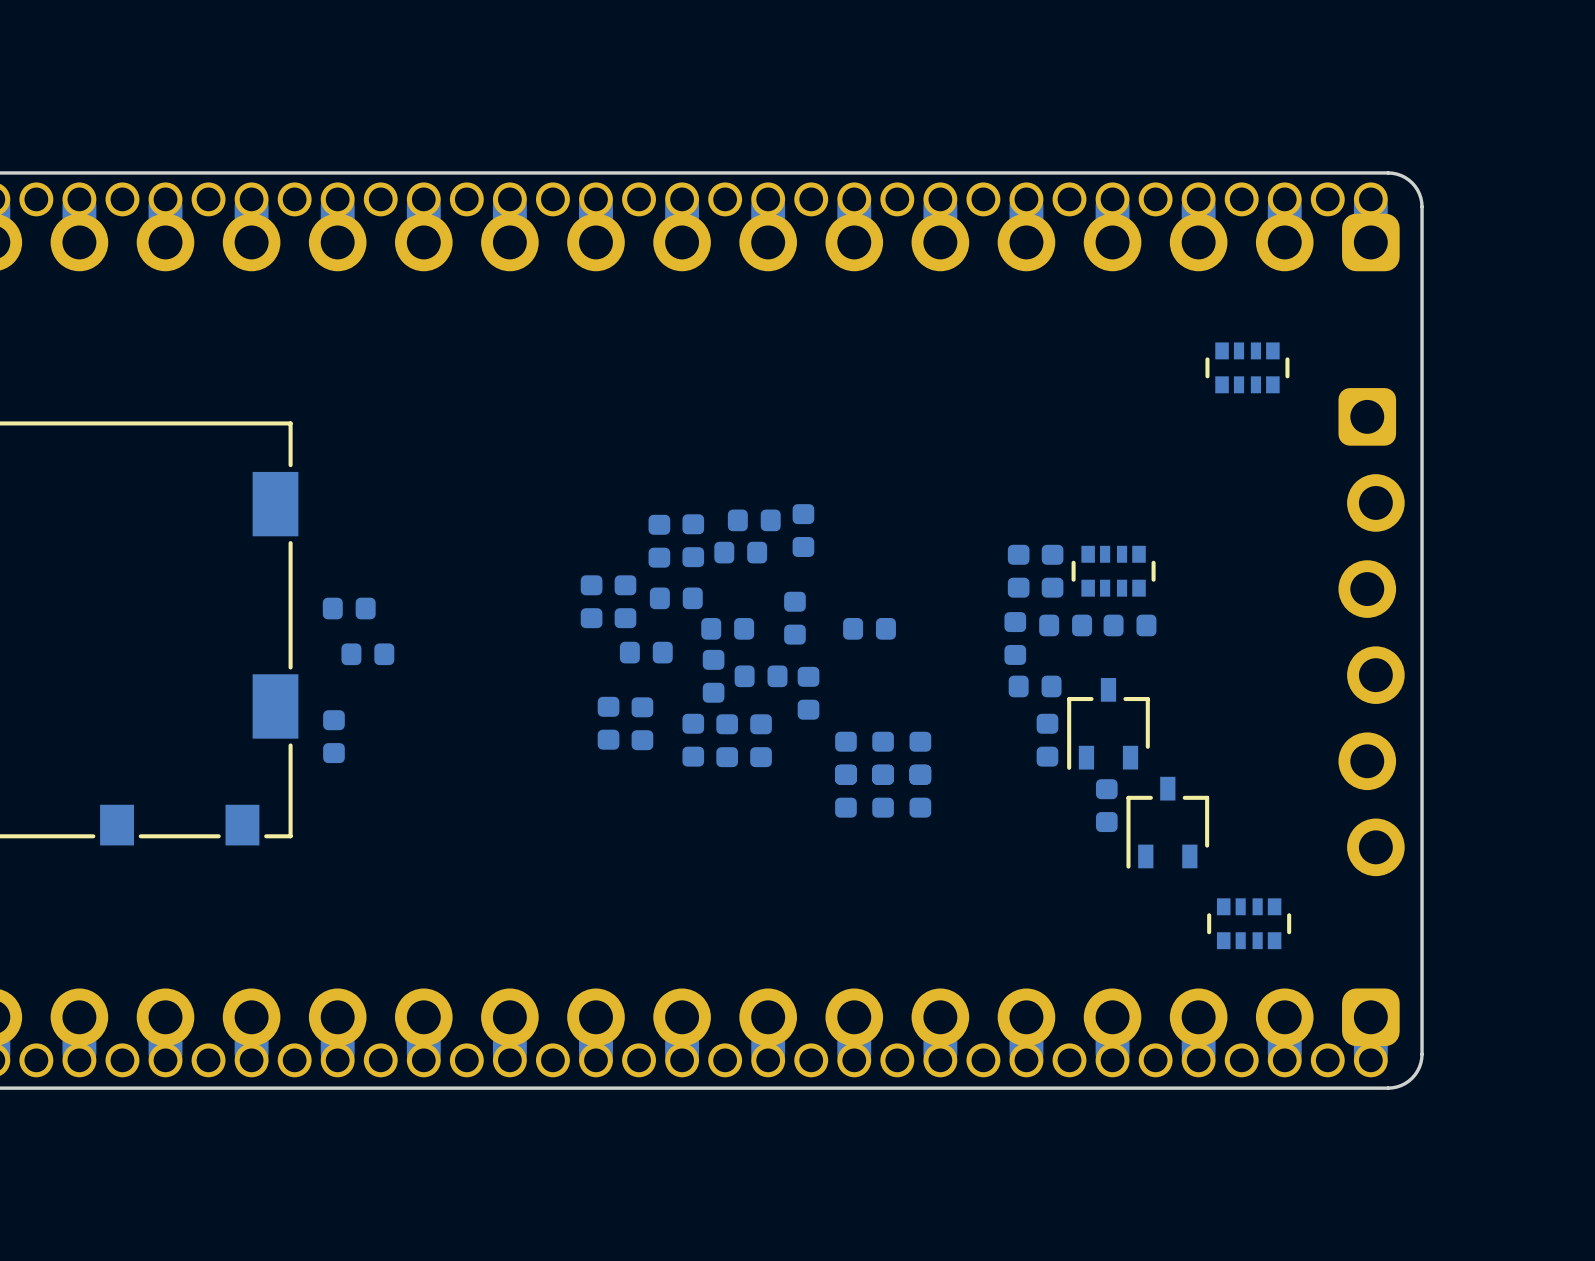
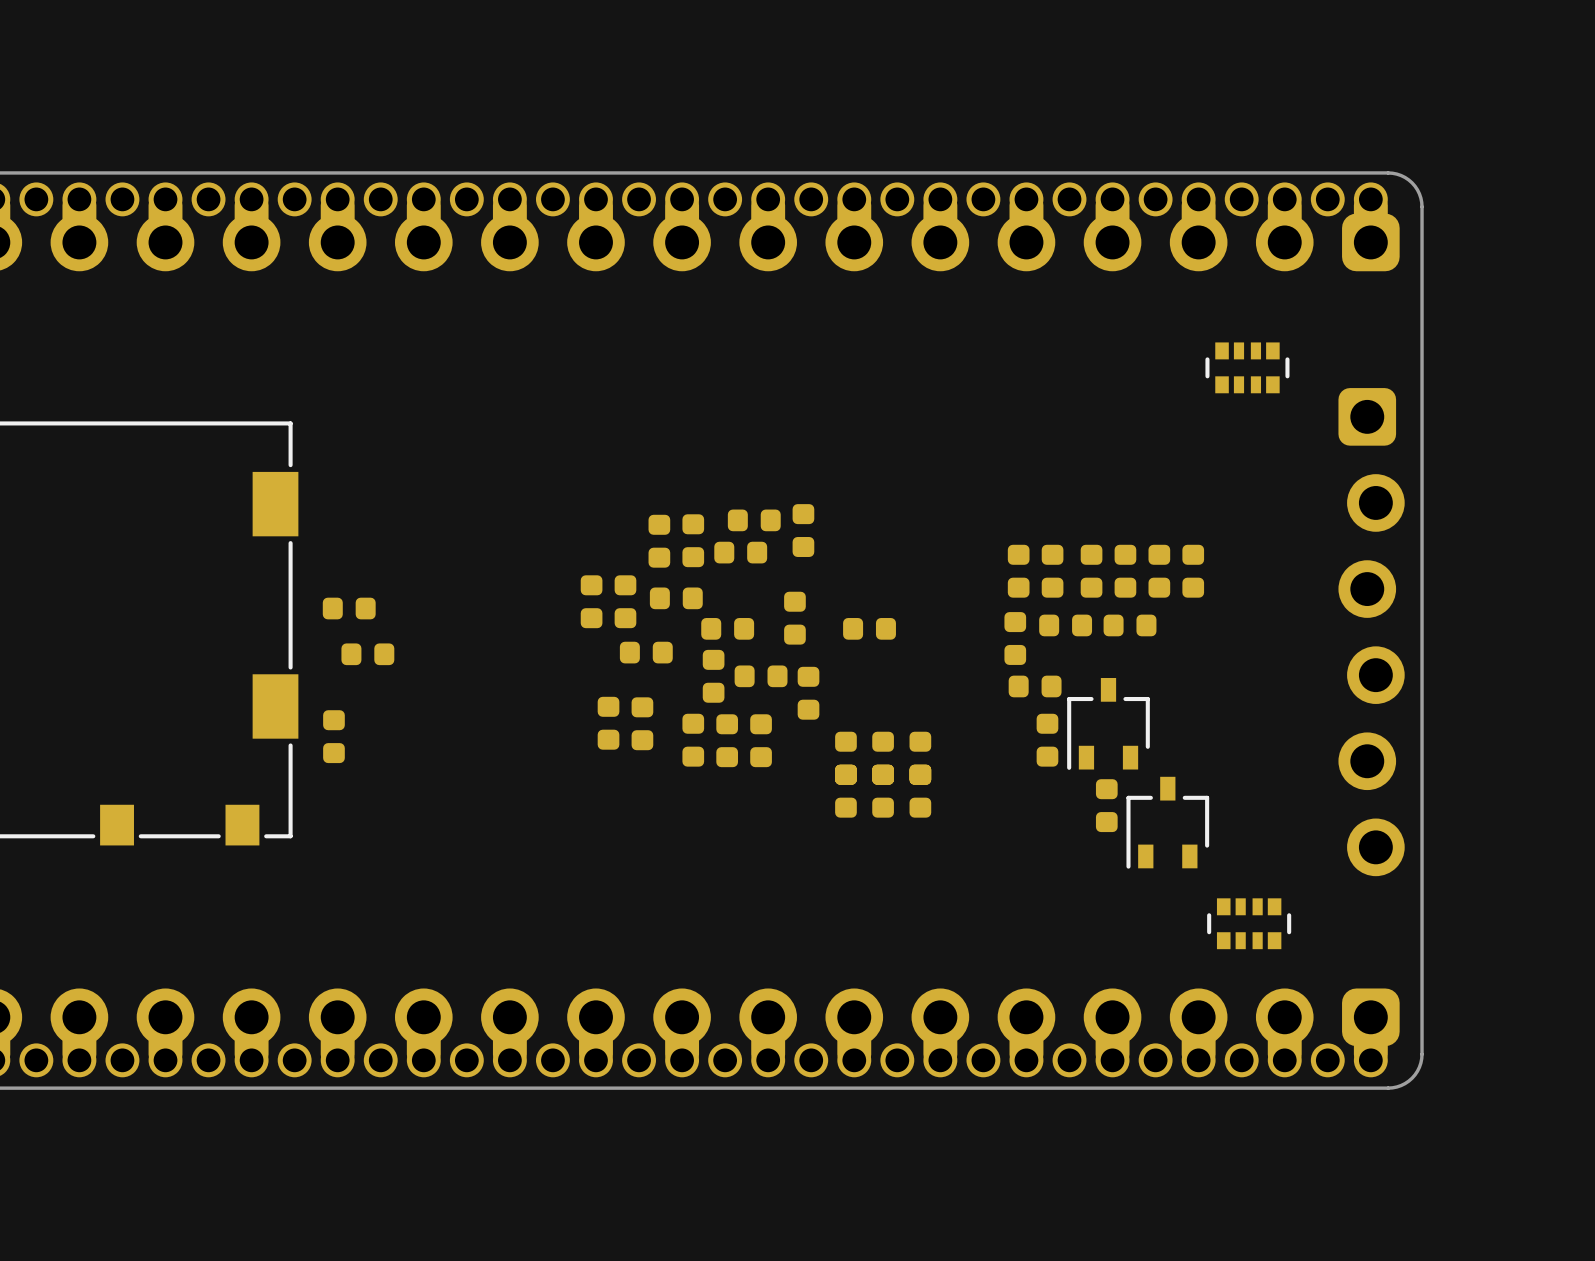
part: none -> (1091, 571)
part: (1113, 571) -> none
part: none -> (1125, 571)
part: none -> (1159, 571)
part: none -> (1193, 571)

